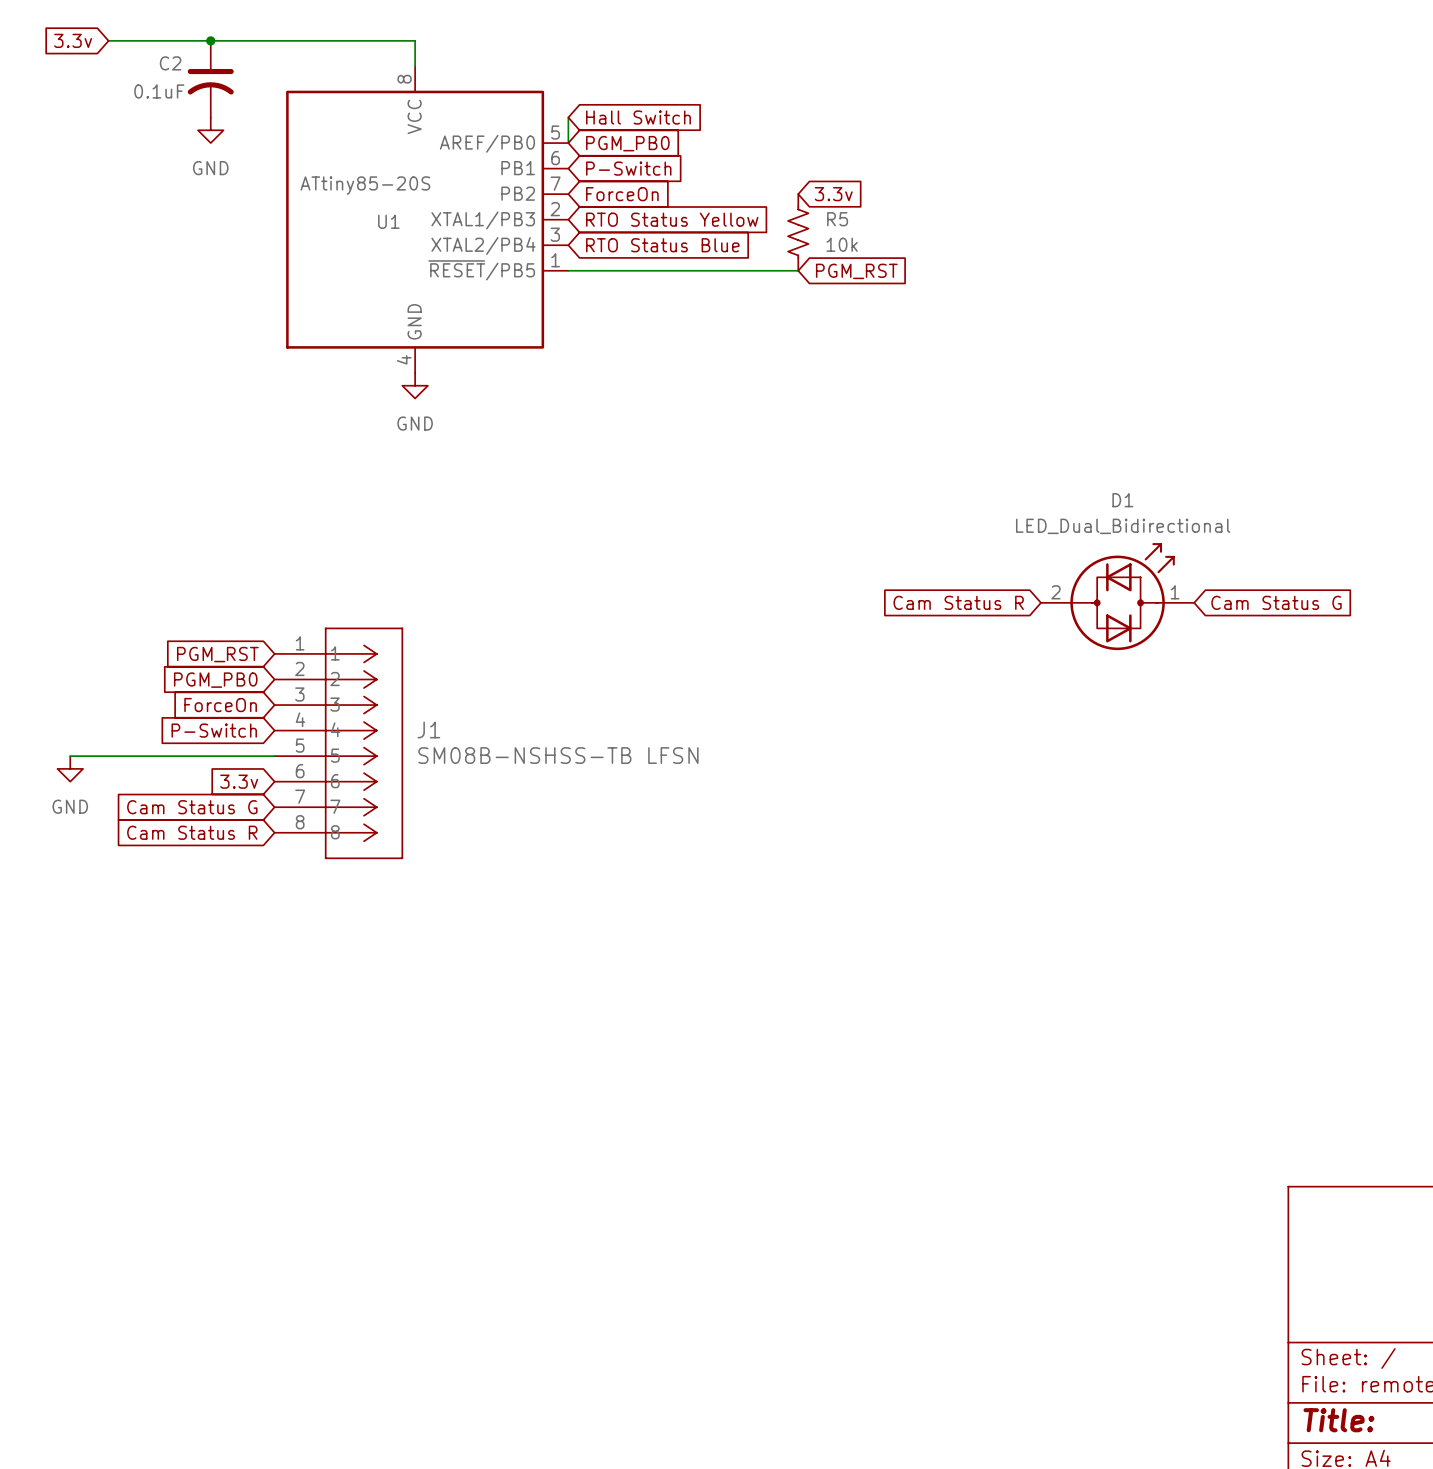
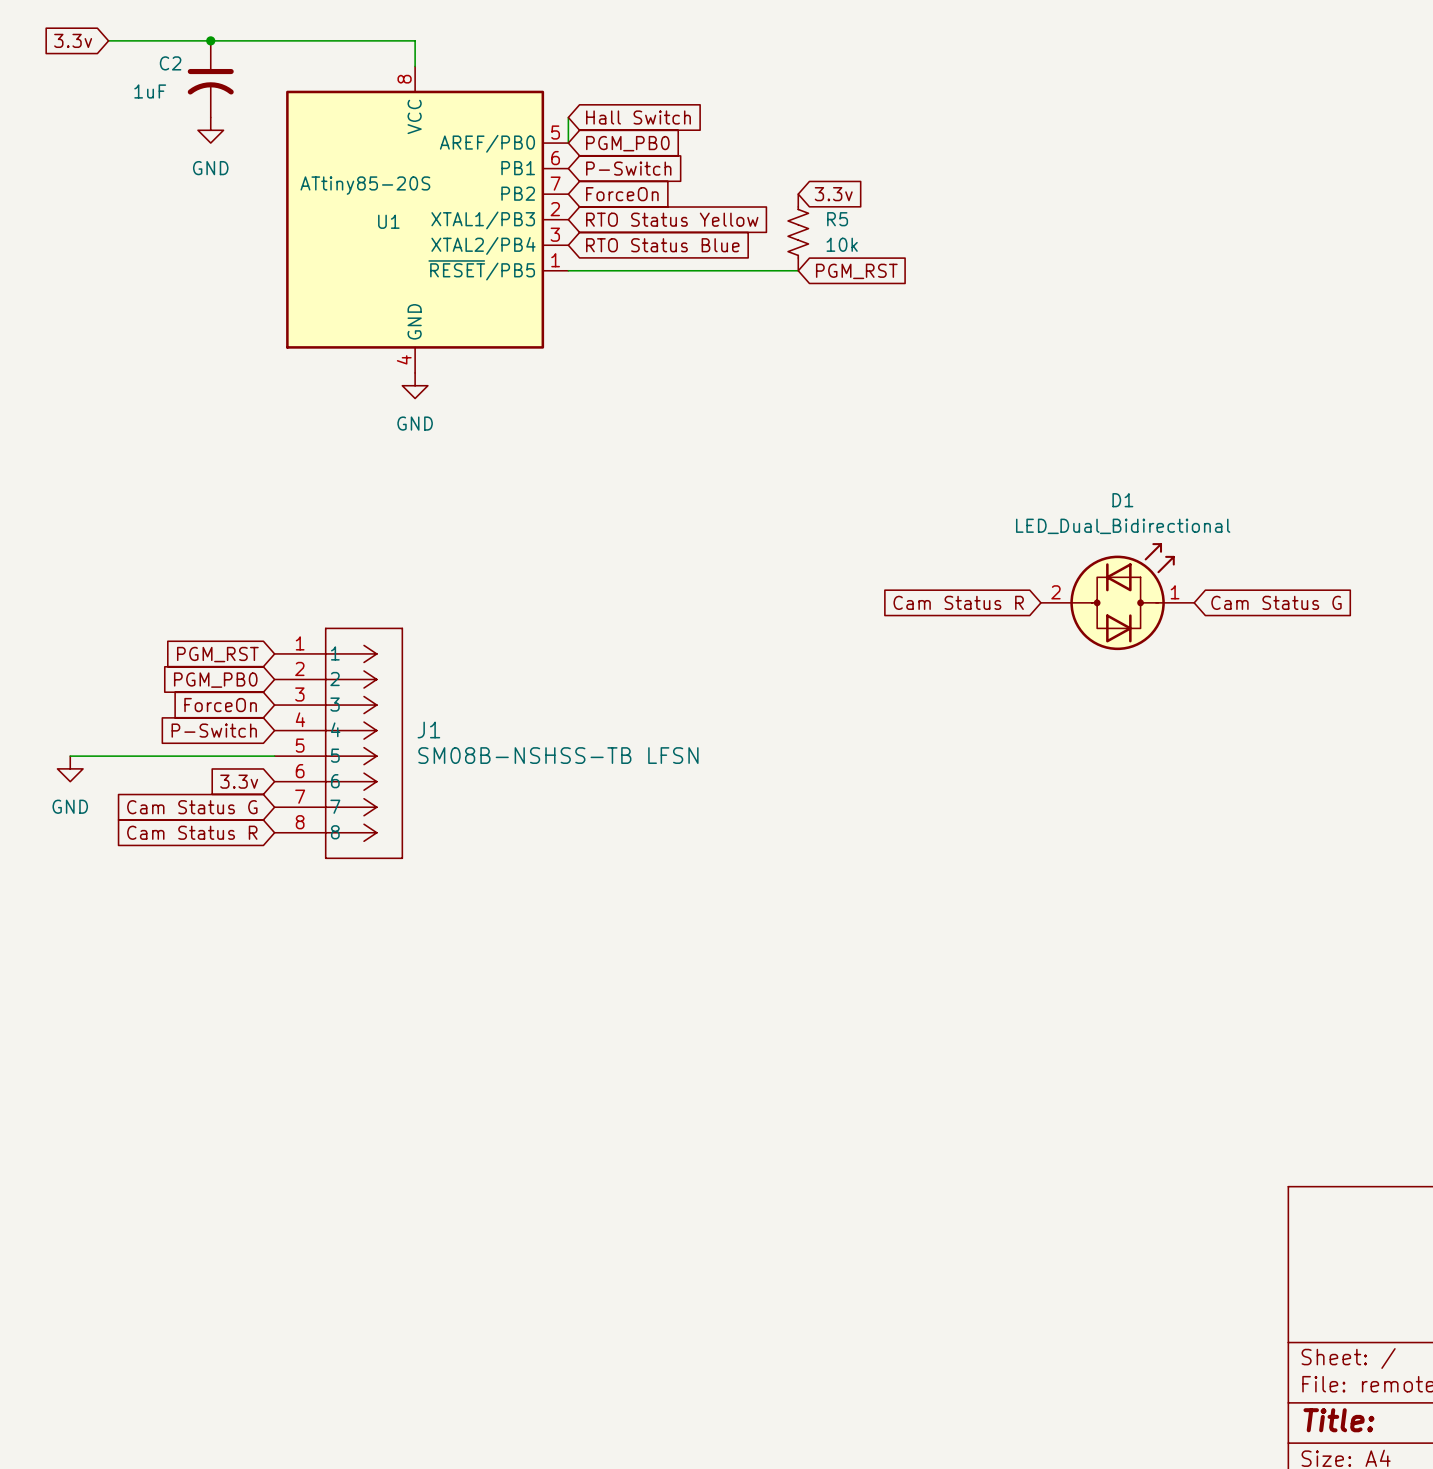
C2 value: 0.1uF (159, 91) -> 1uF (150, 91)

